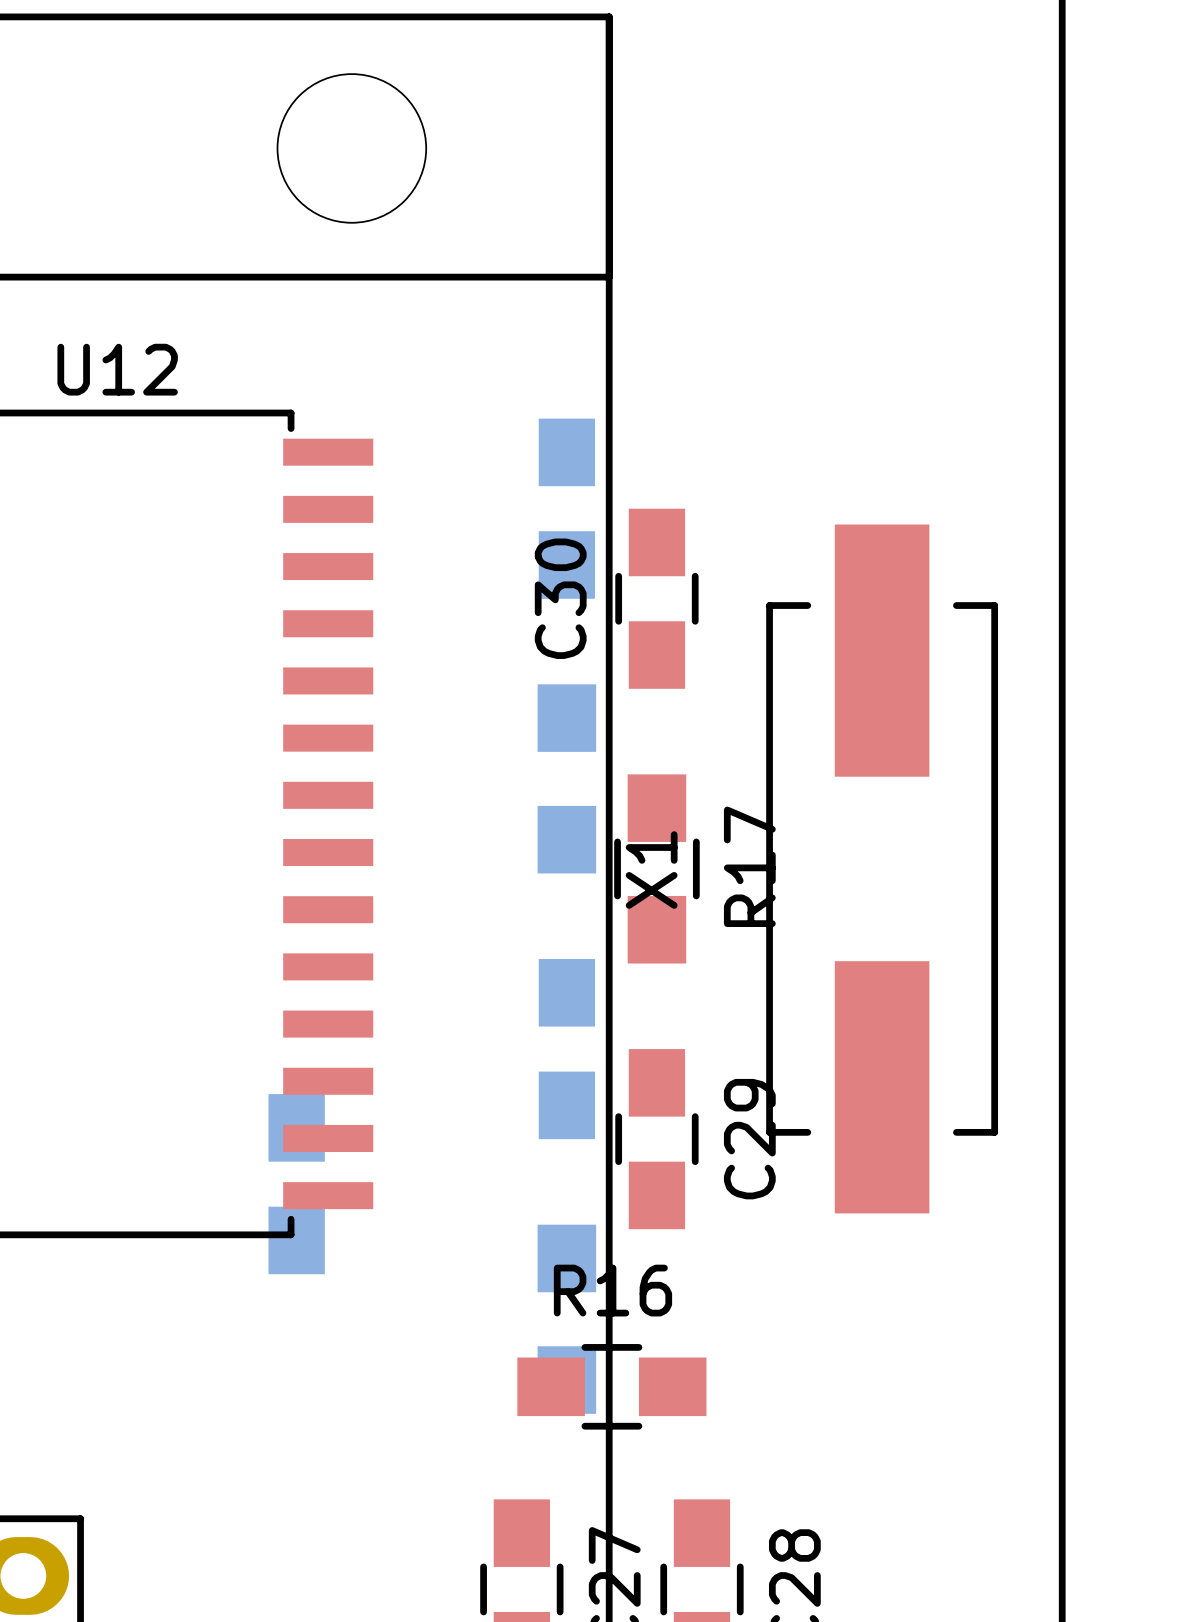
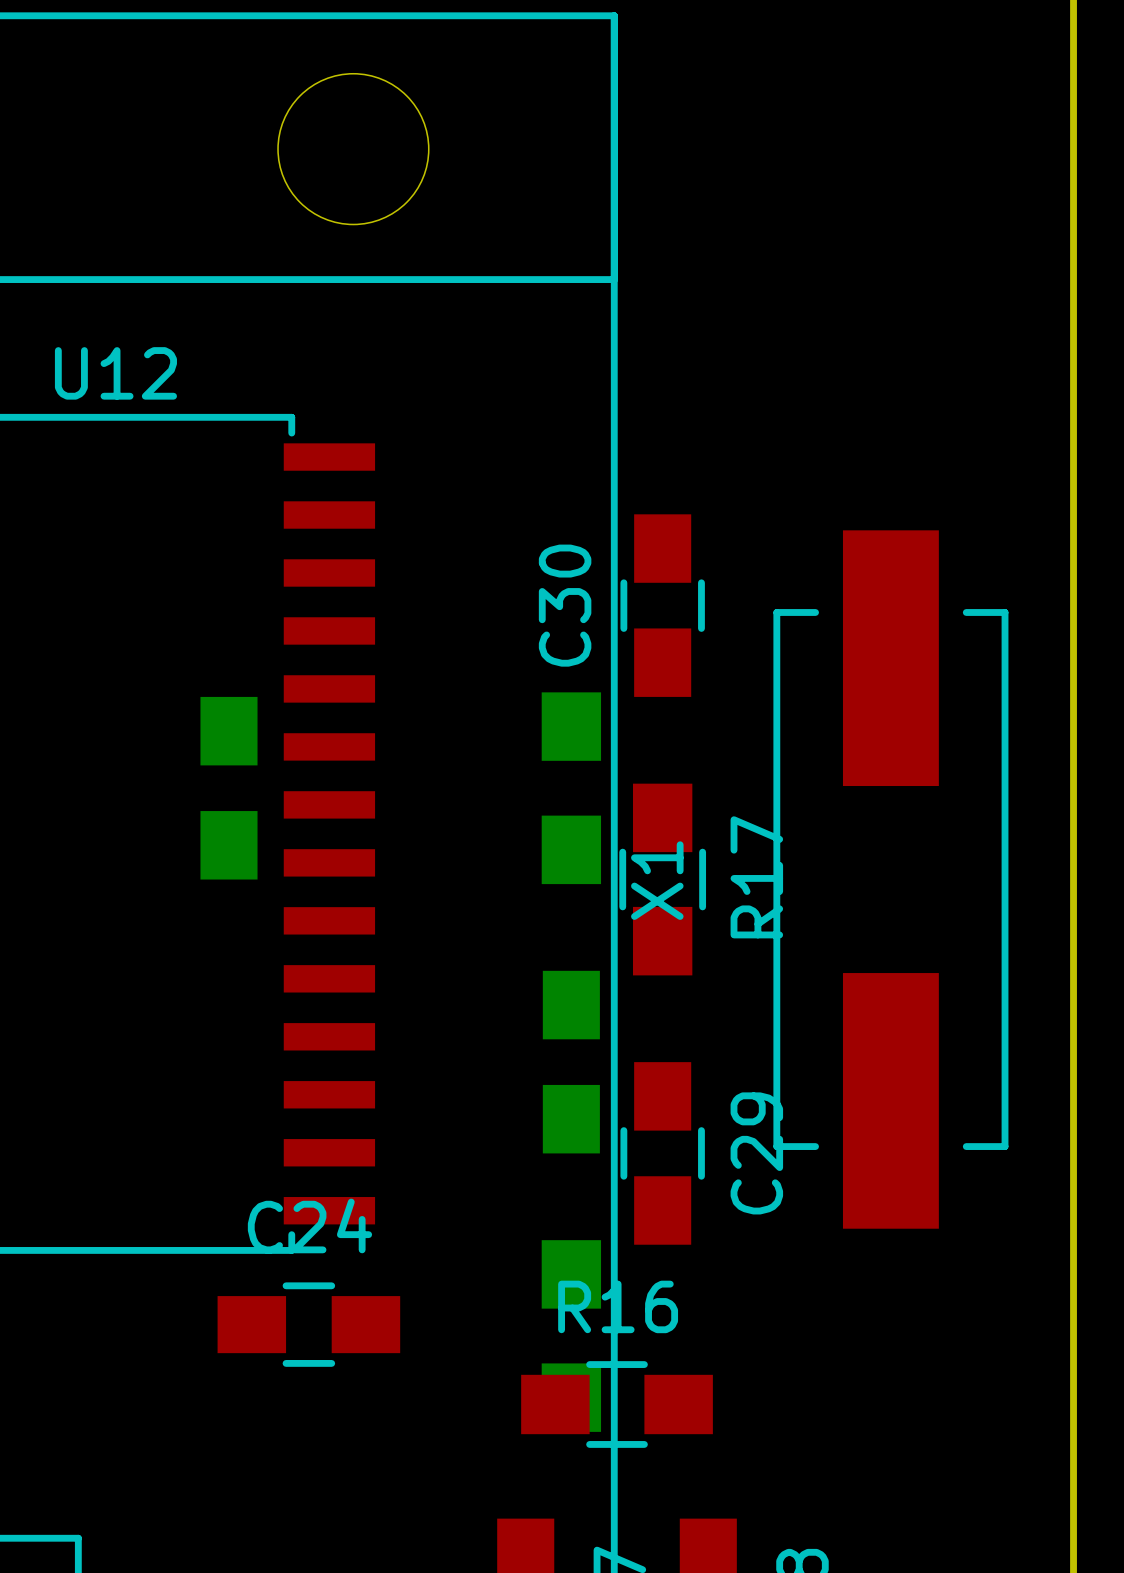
part position: (566, 508) -> (228, 788)
C24 side: bottom (296, 1184) -> top (308, 1324)

